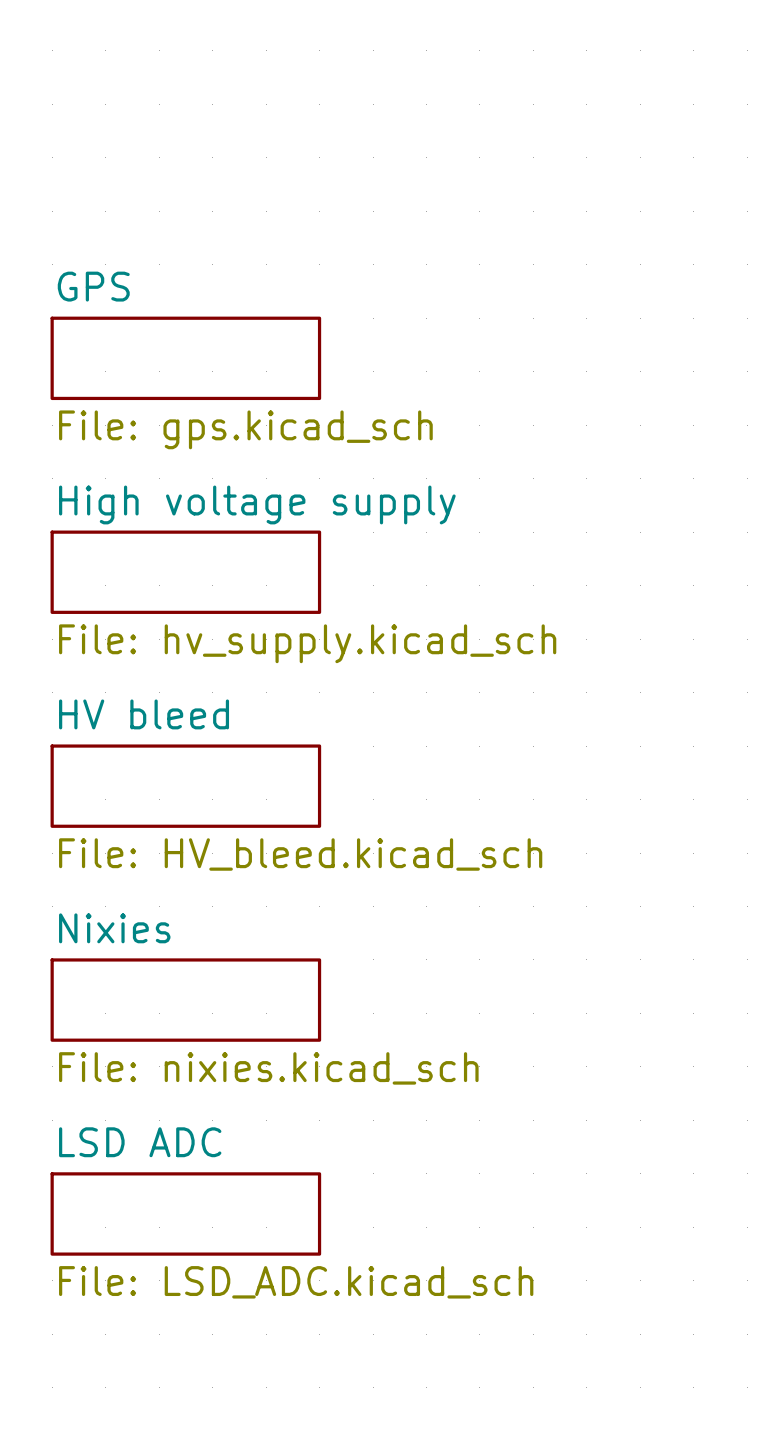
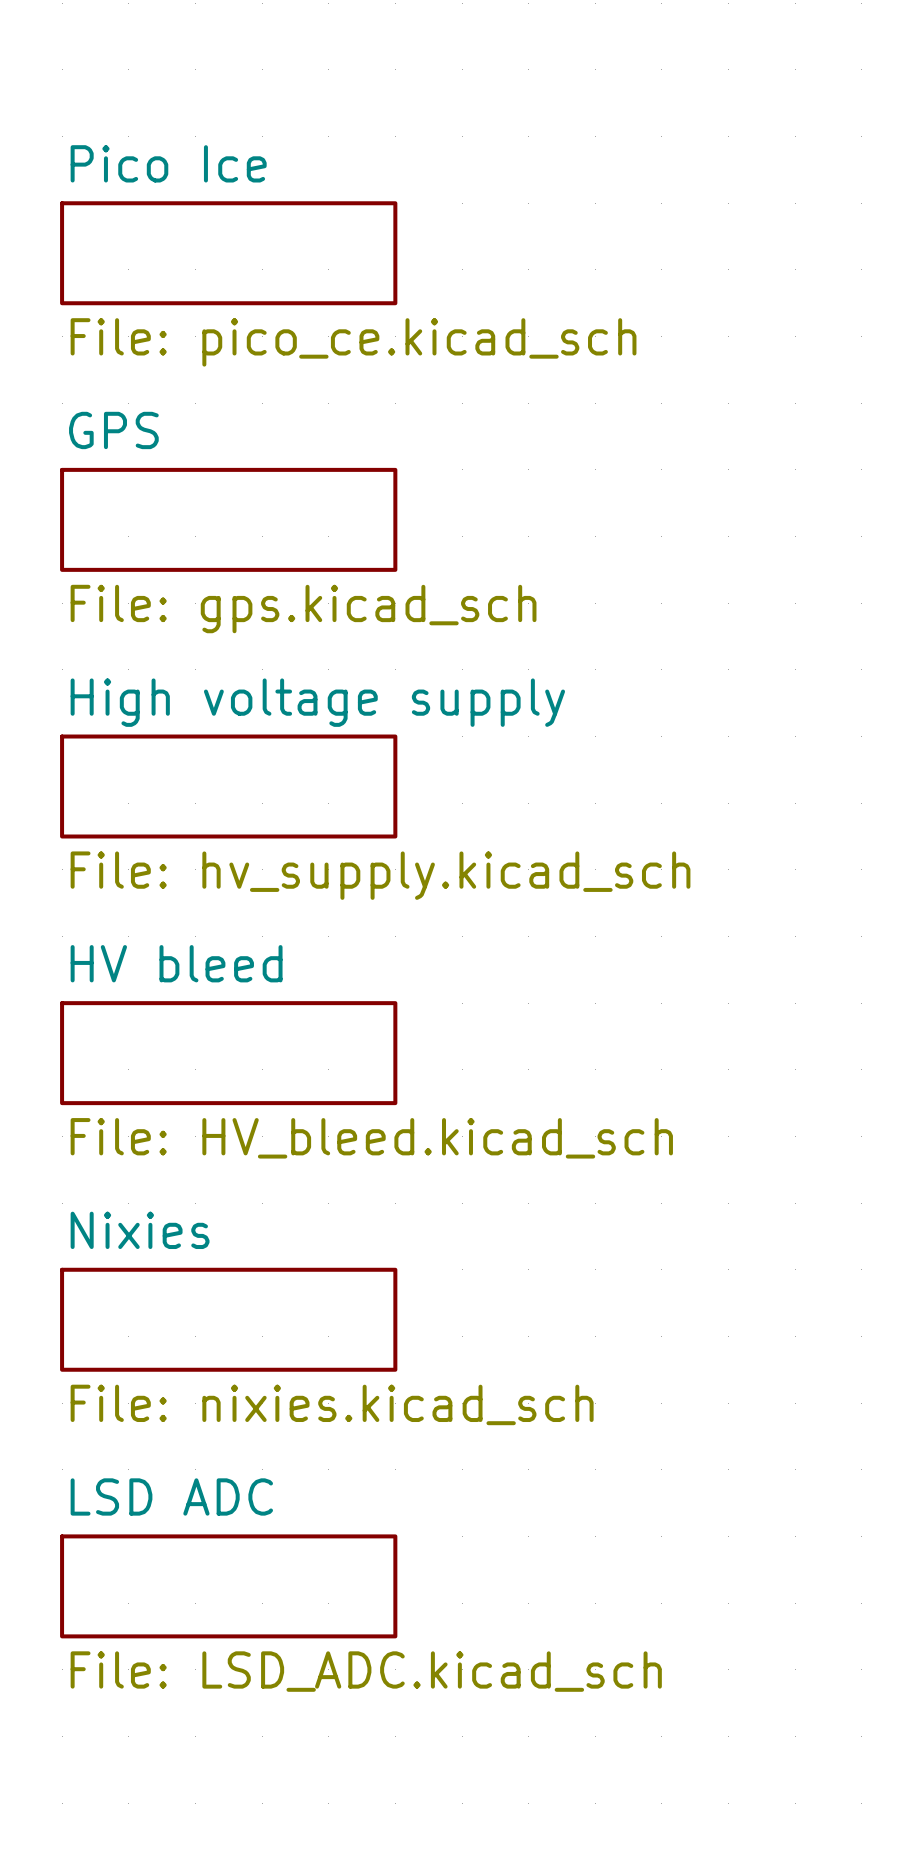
sheet Pico Ice: none -> File: pico_ce.kicad_sch (228, 253)

